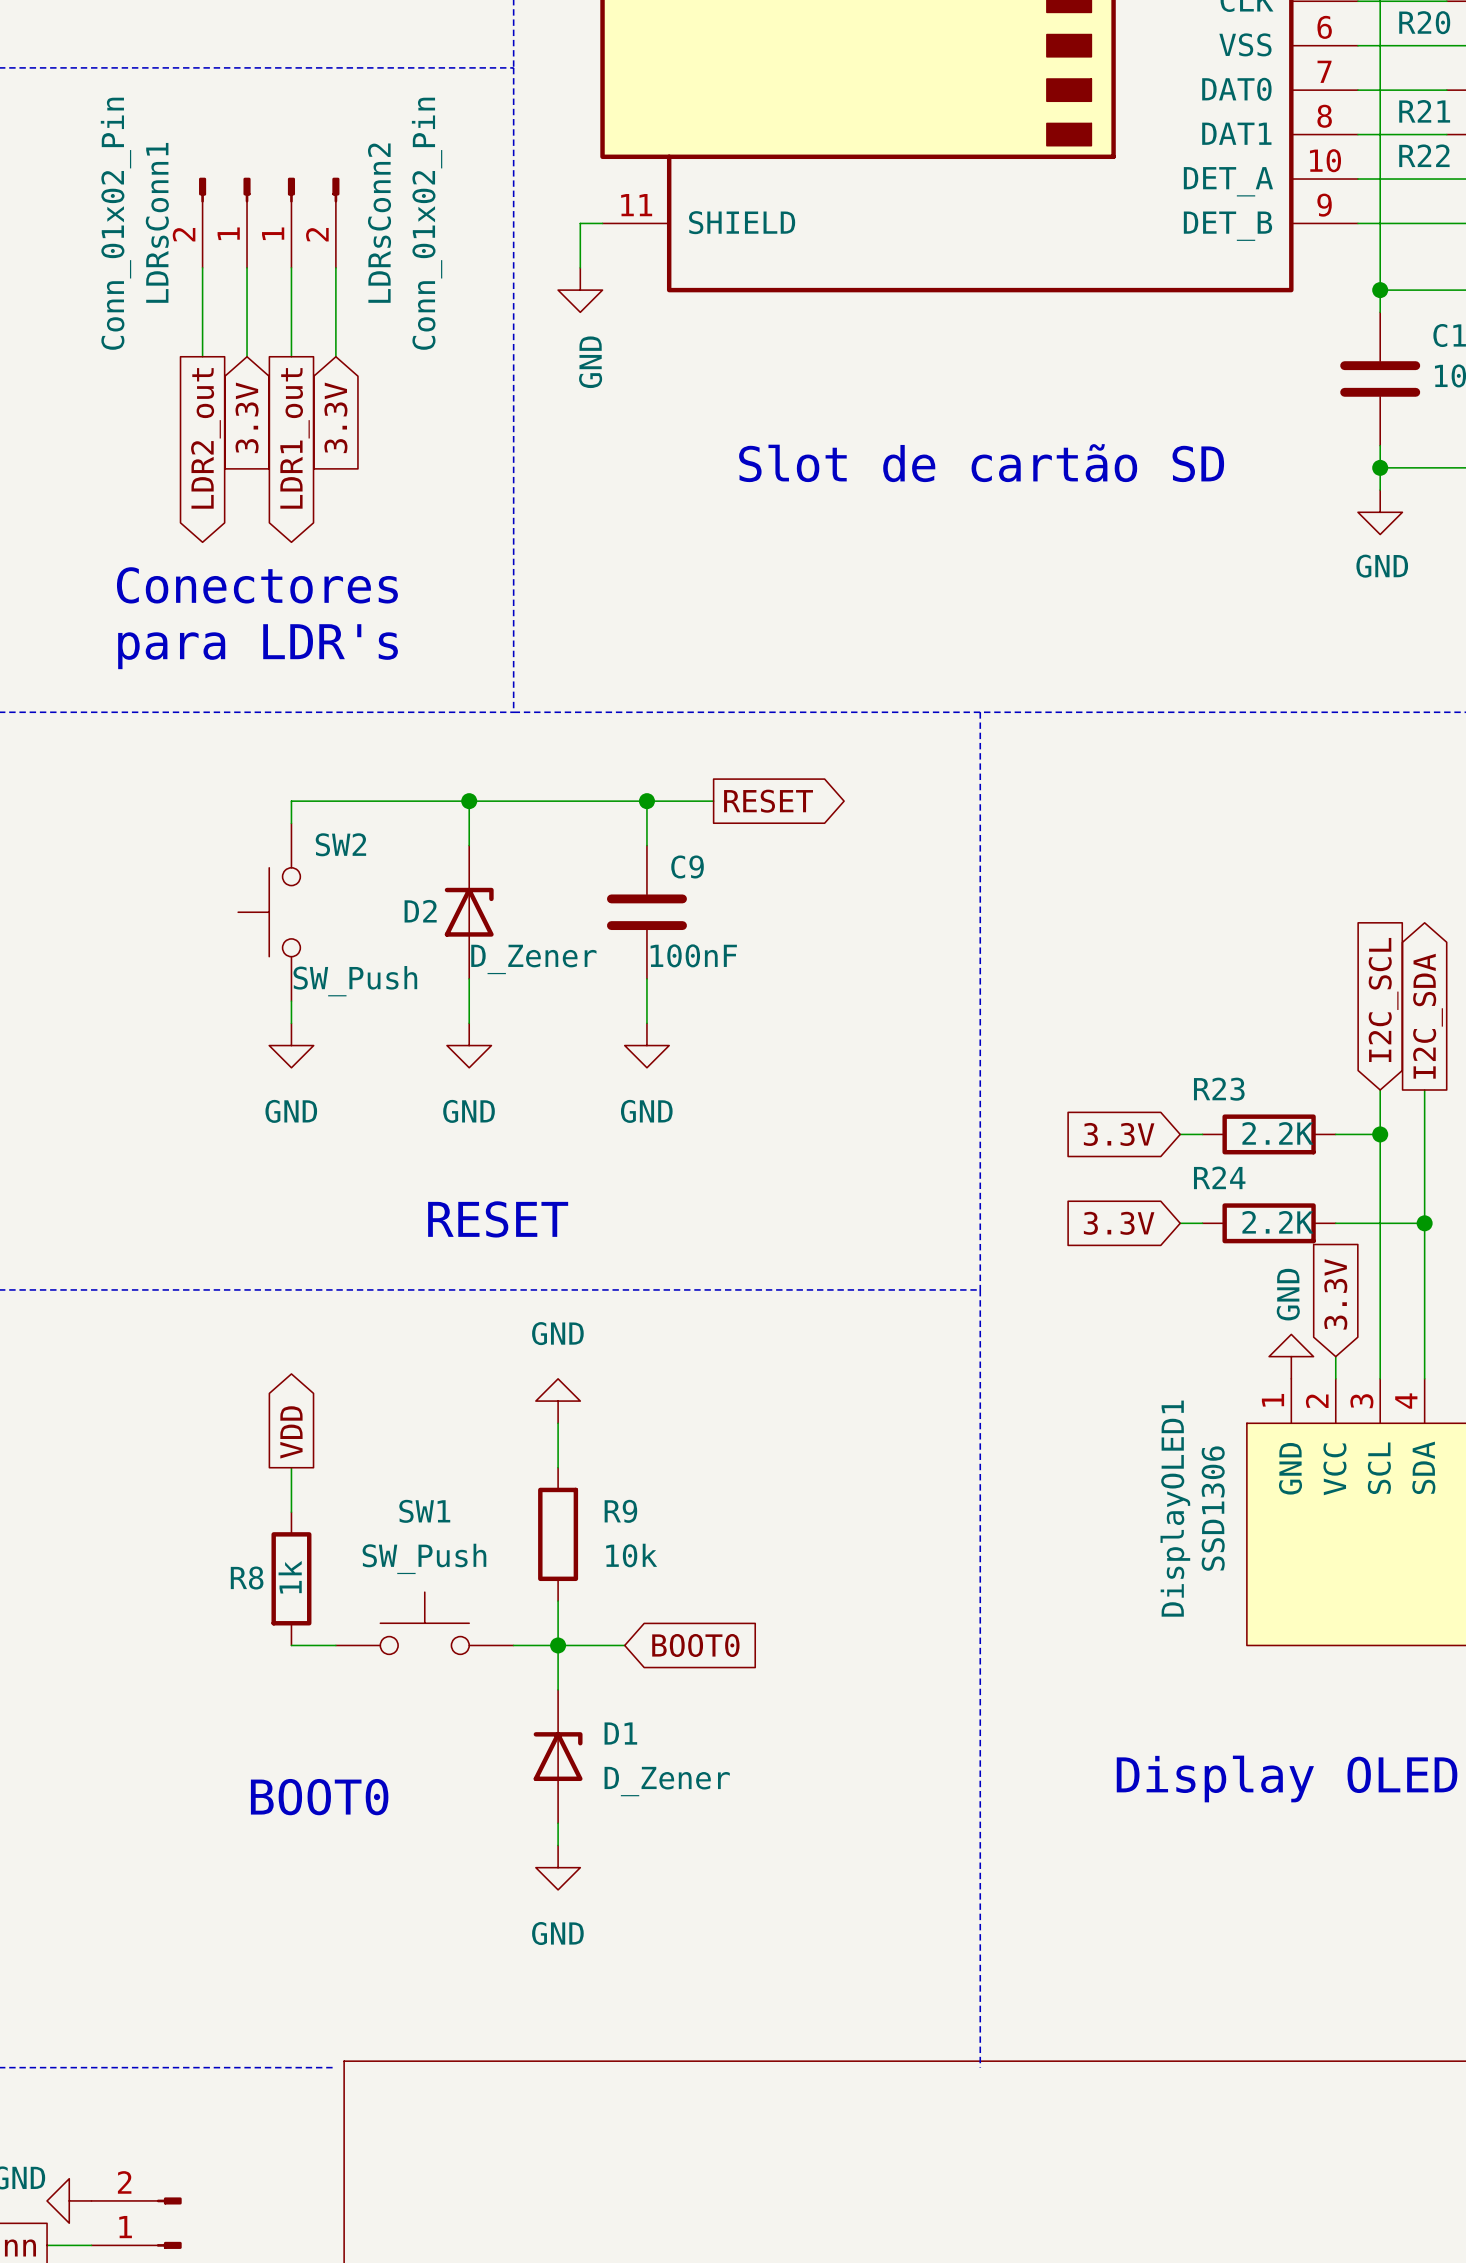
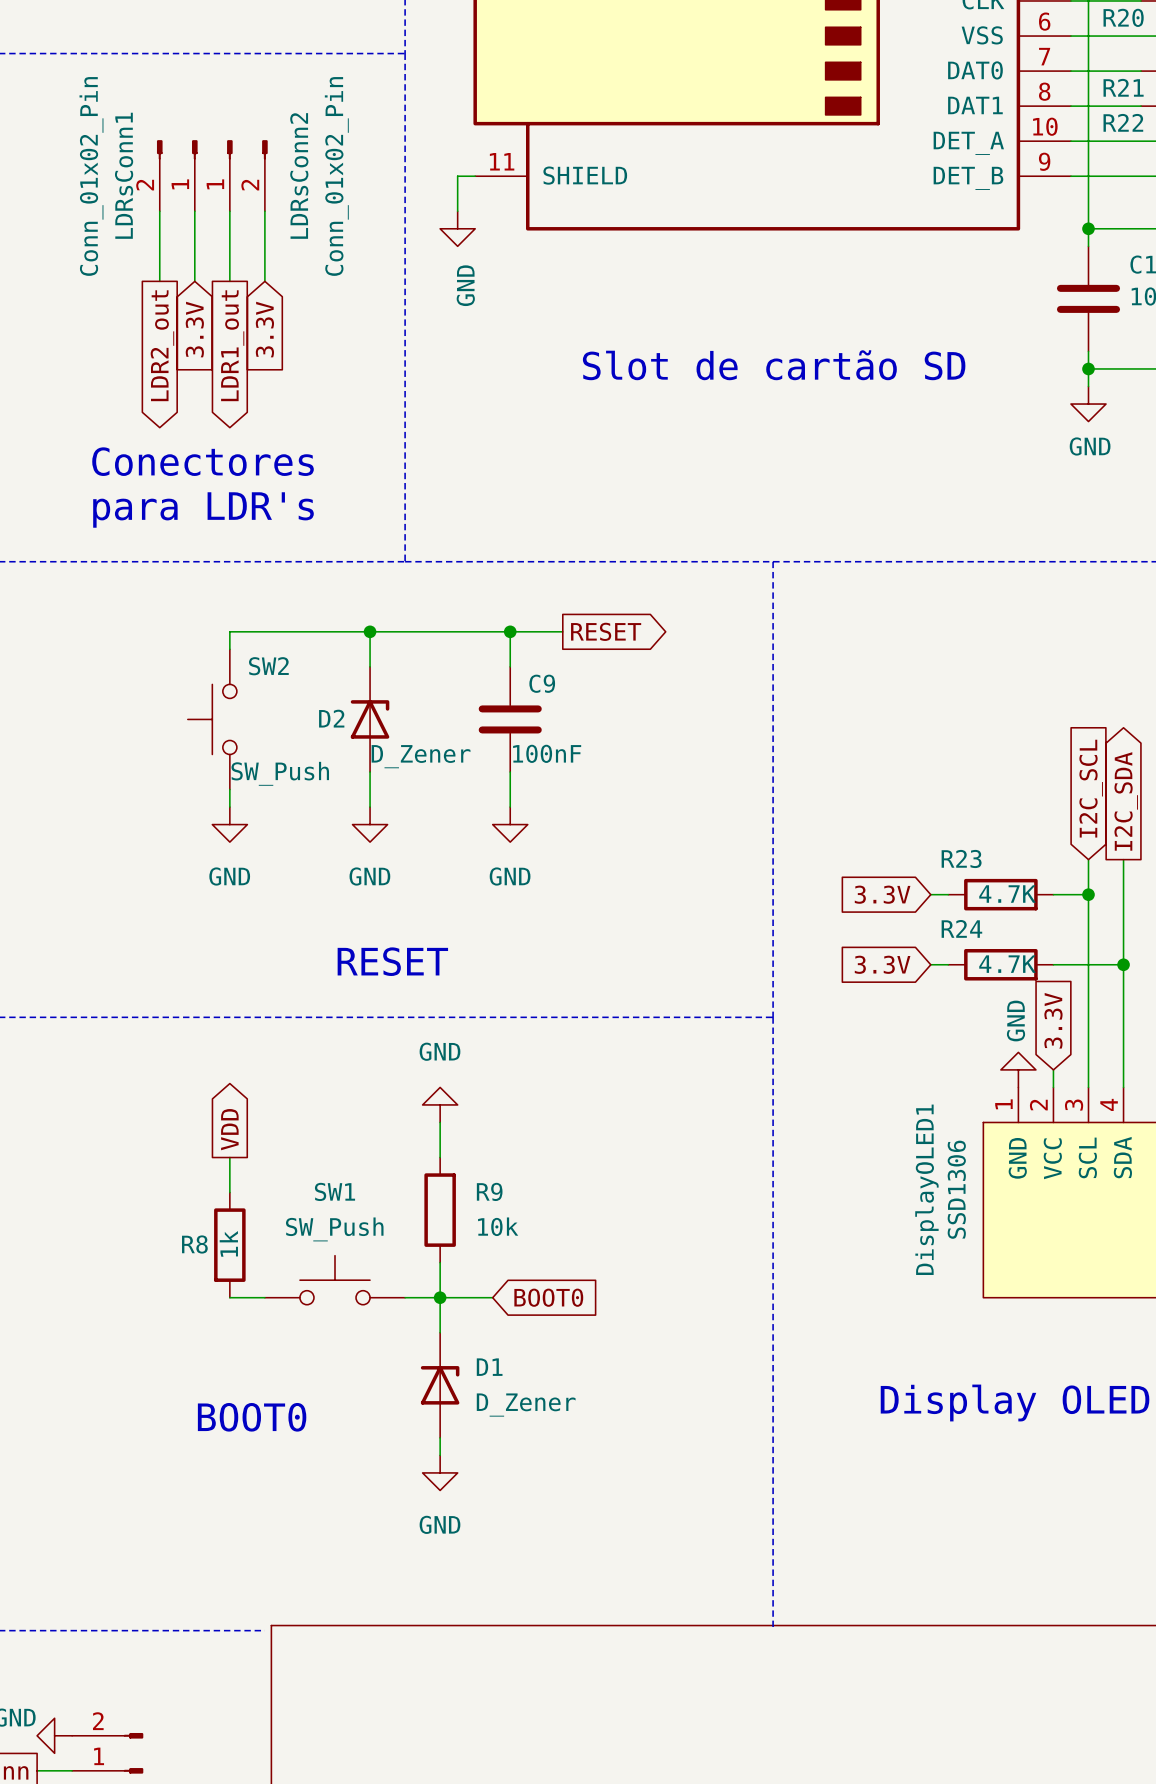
R23 value: 2.2K (1277, 1133) -> 4.7K (1007, 894)
R24 value: 2.2K (1277, 1222) -> 4.7K (1007, 964)

